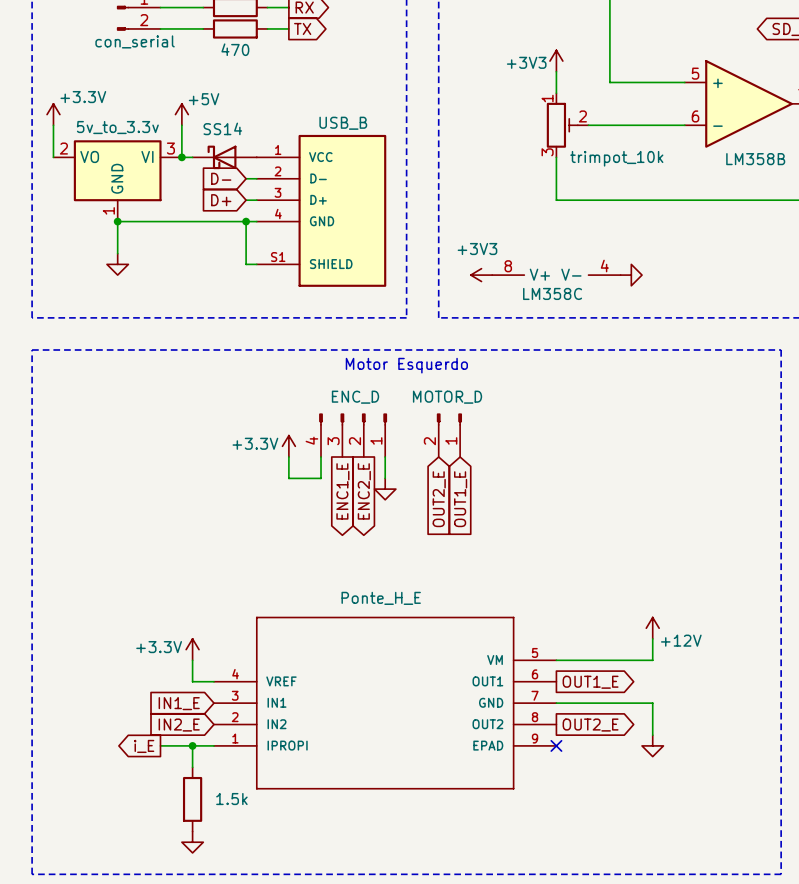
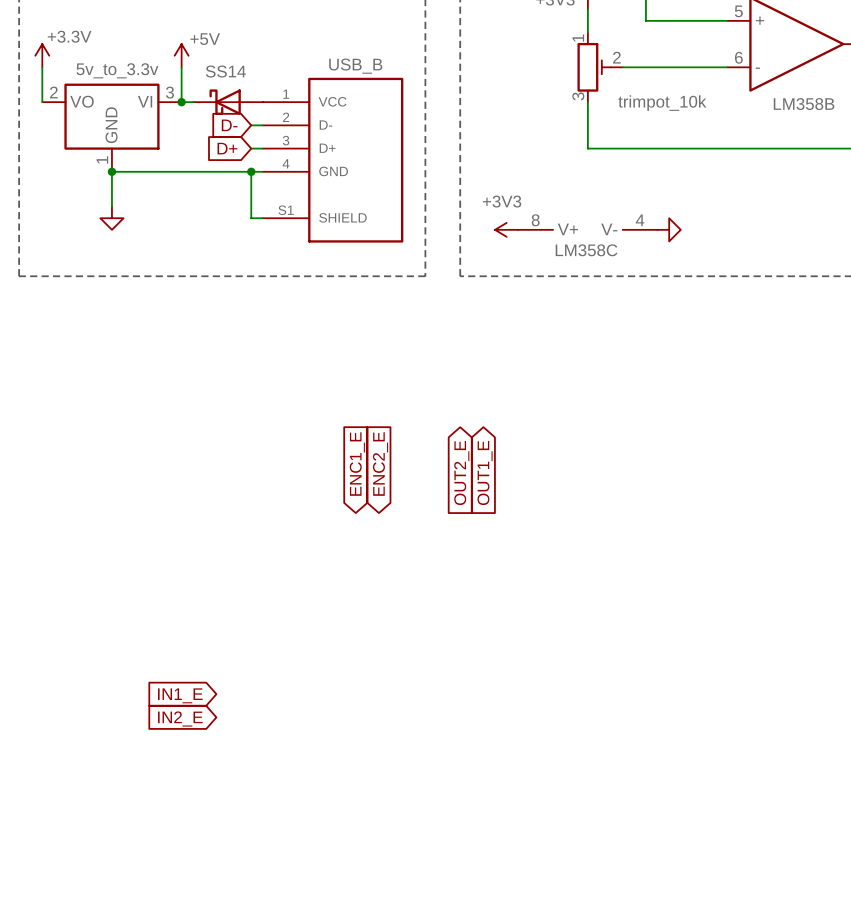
line: (32, 349) (781, 349) (781, 874) (32, 874) (32, 349) -> none
text: Motor Esquerdo (406, 365) -> none
part: ENC_D (353, 435) -> none
part: MOTOR_D (449, 435) -> none
power symbol: +3.3V (288, 446) -> none
wire: (288, 457) (288, 478) (321, 478) (321, 457) -> none
wire: (385, 457) (385, 478) -> none
power symbol: (385, 489) -> none
power symbol: +12V (652, 628) -> none
wire: (652, 638) (652, 660) (556, 660) -> none
power symbol: +3.3V (192, 649) -> none
wire: (192, 660) (192, 681) (213, 681) -> none
global label: OUT1_E (590, 682) -> none
part: Ponte_H_E (385, 703) -> none
wire: (556, 703) (652, 703) (652, 735) -> none
global label: OUT2_E (590, 725) -> none
wire: (160, 745) (213, 745) -> none
wire: (192, 745) (192, 767) -> none
junction: (192, 745) -> none
no-connect mark: (556, 745) -> none
power symbol: (652, 745) -> none
global label: i_E (144, 746) -> none
part: 1.5k (192, 799) -> none
power symbol: (192, 842) -> none

